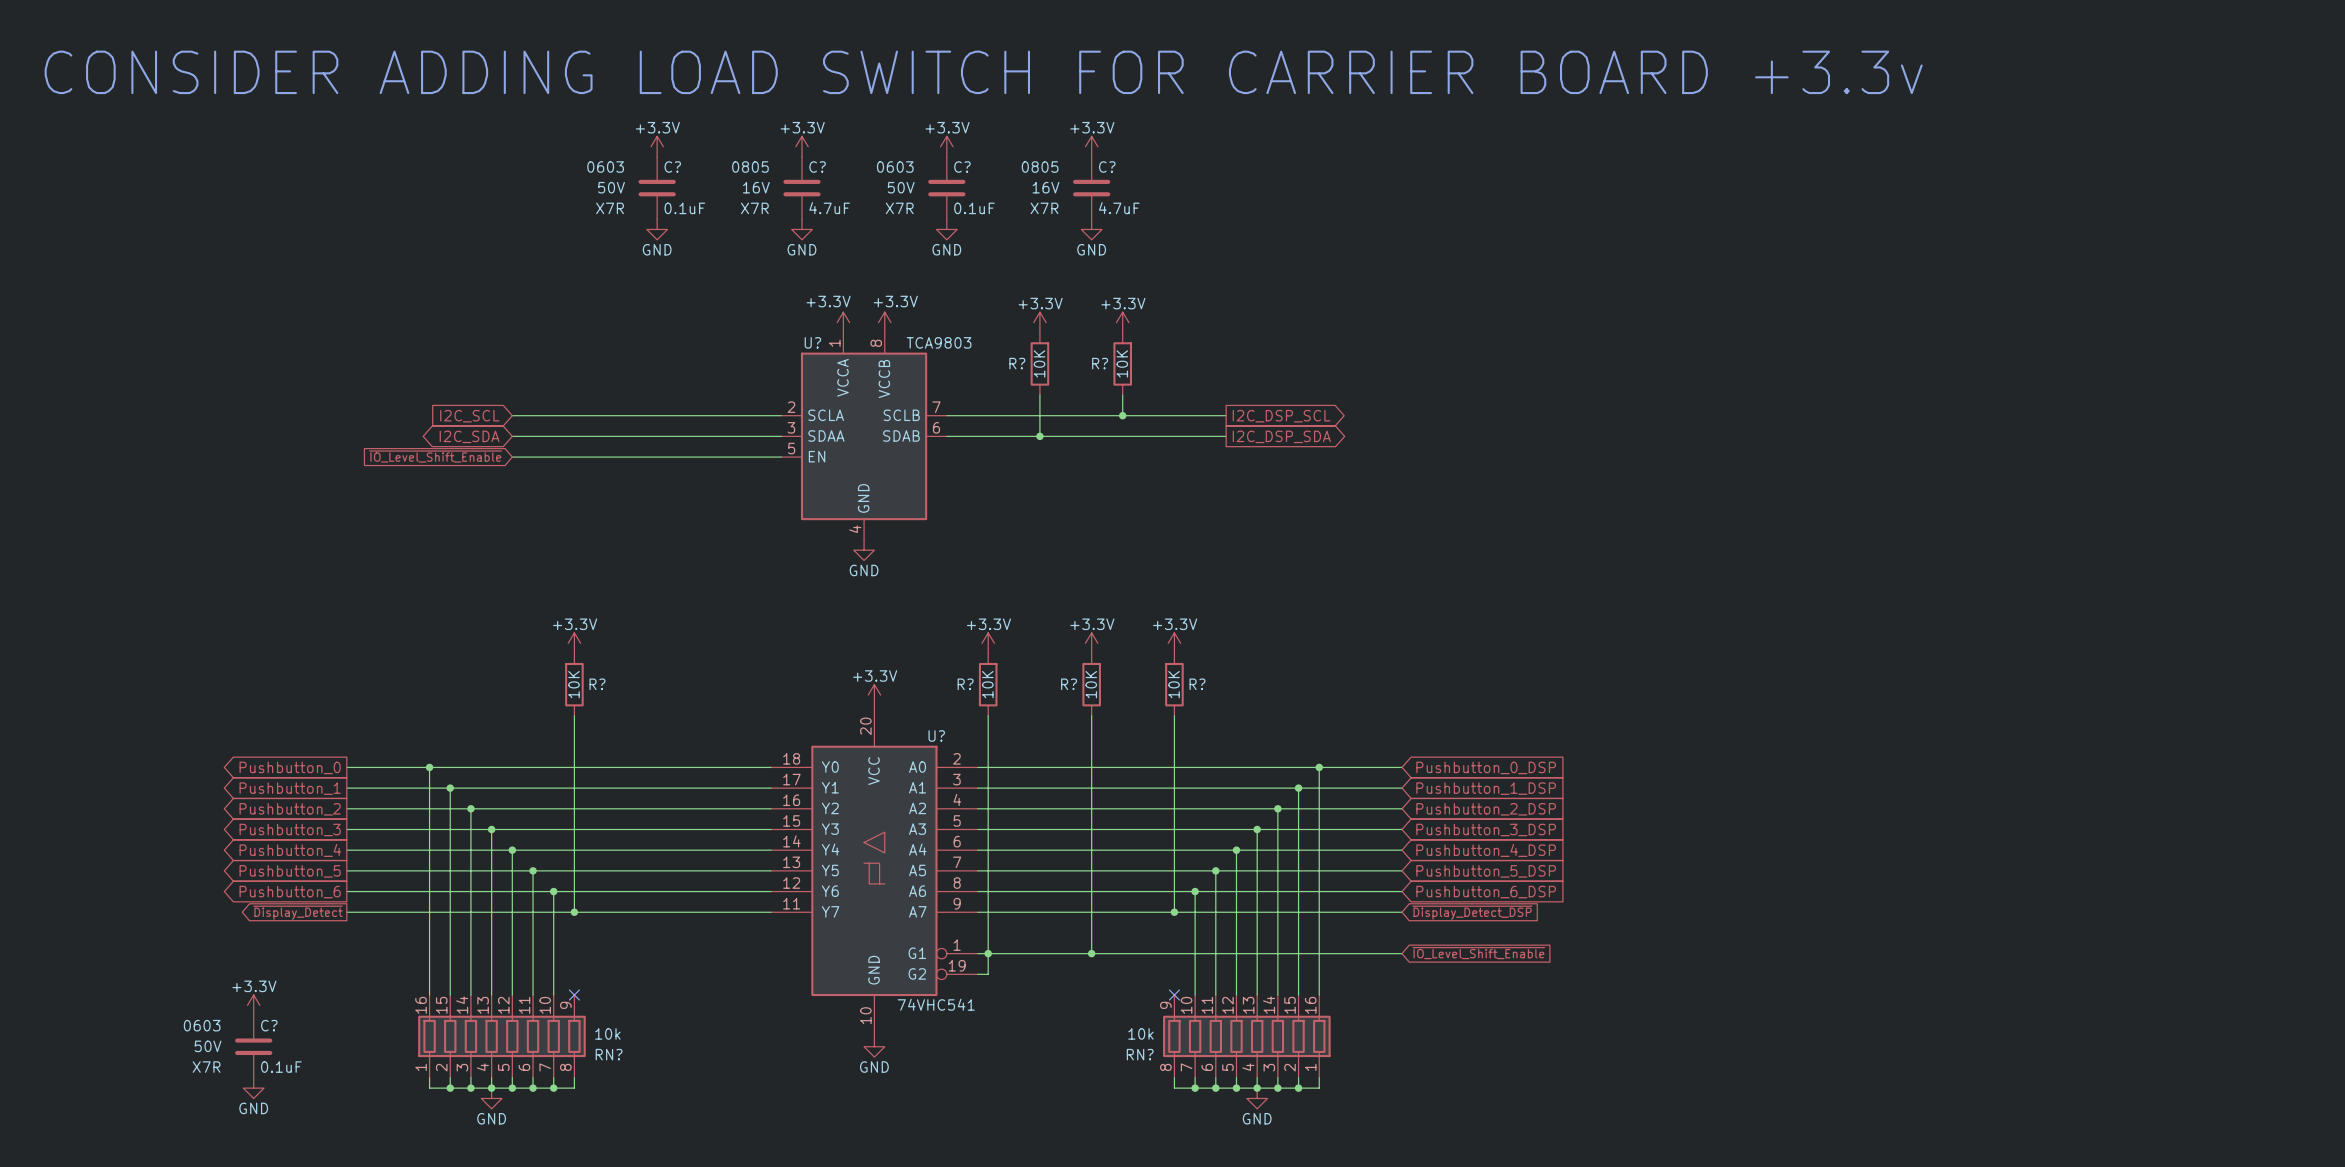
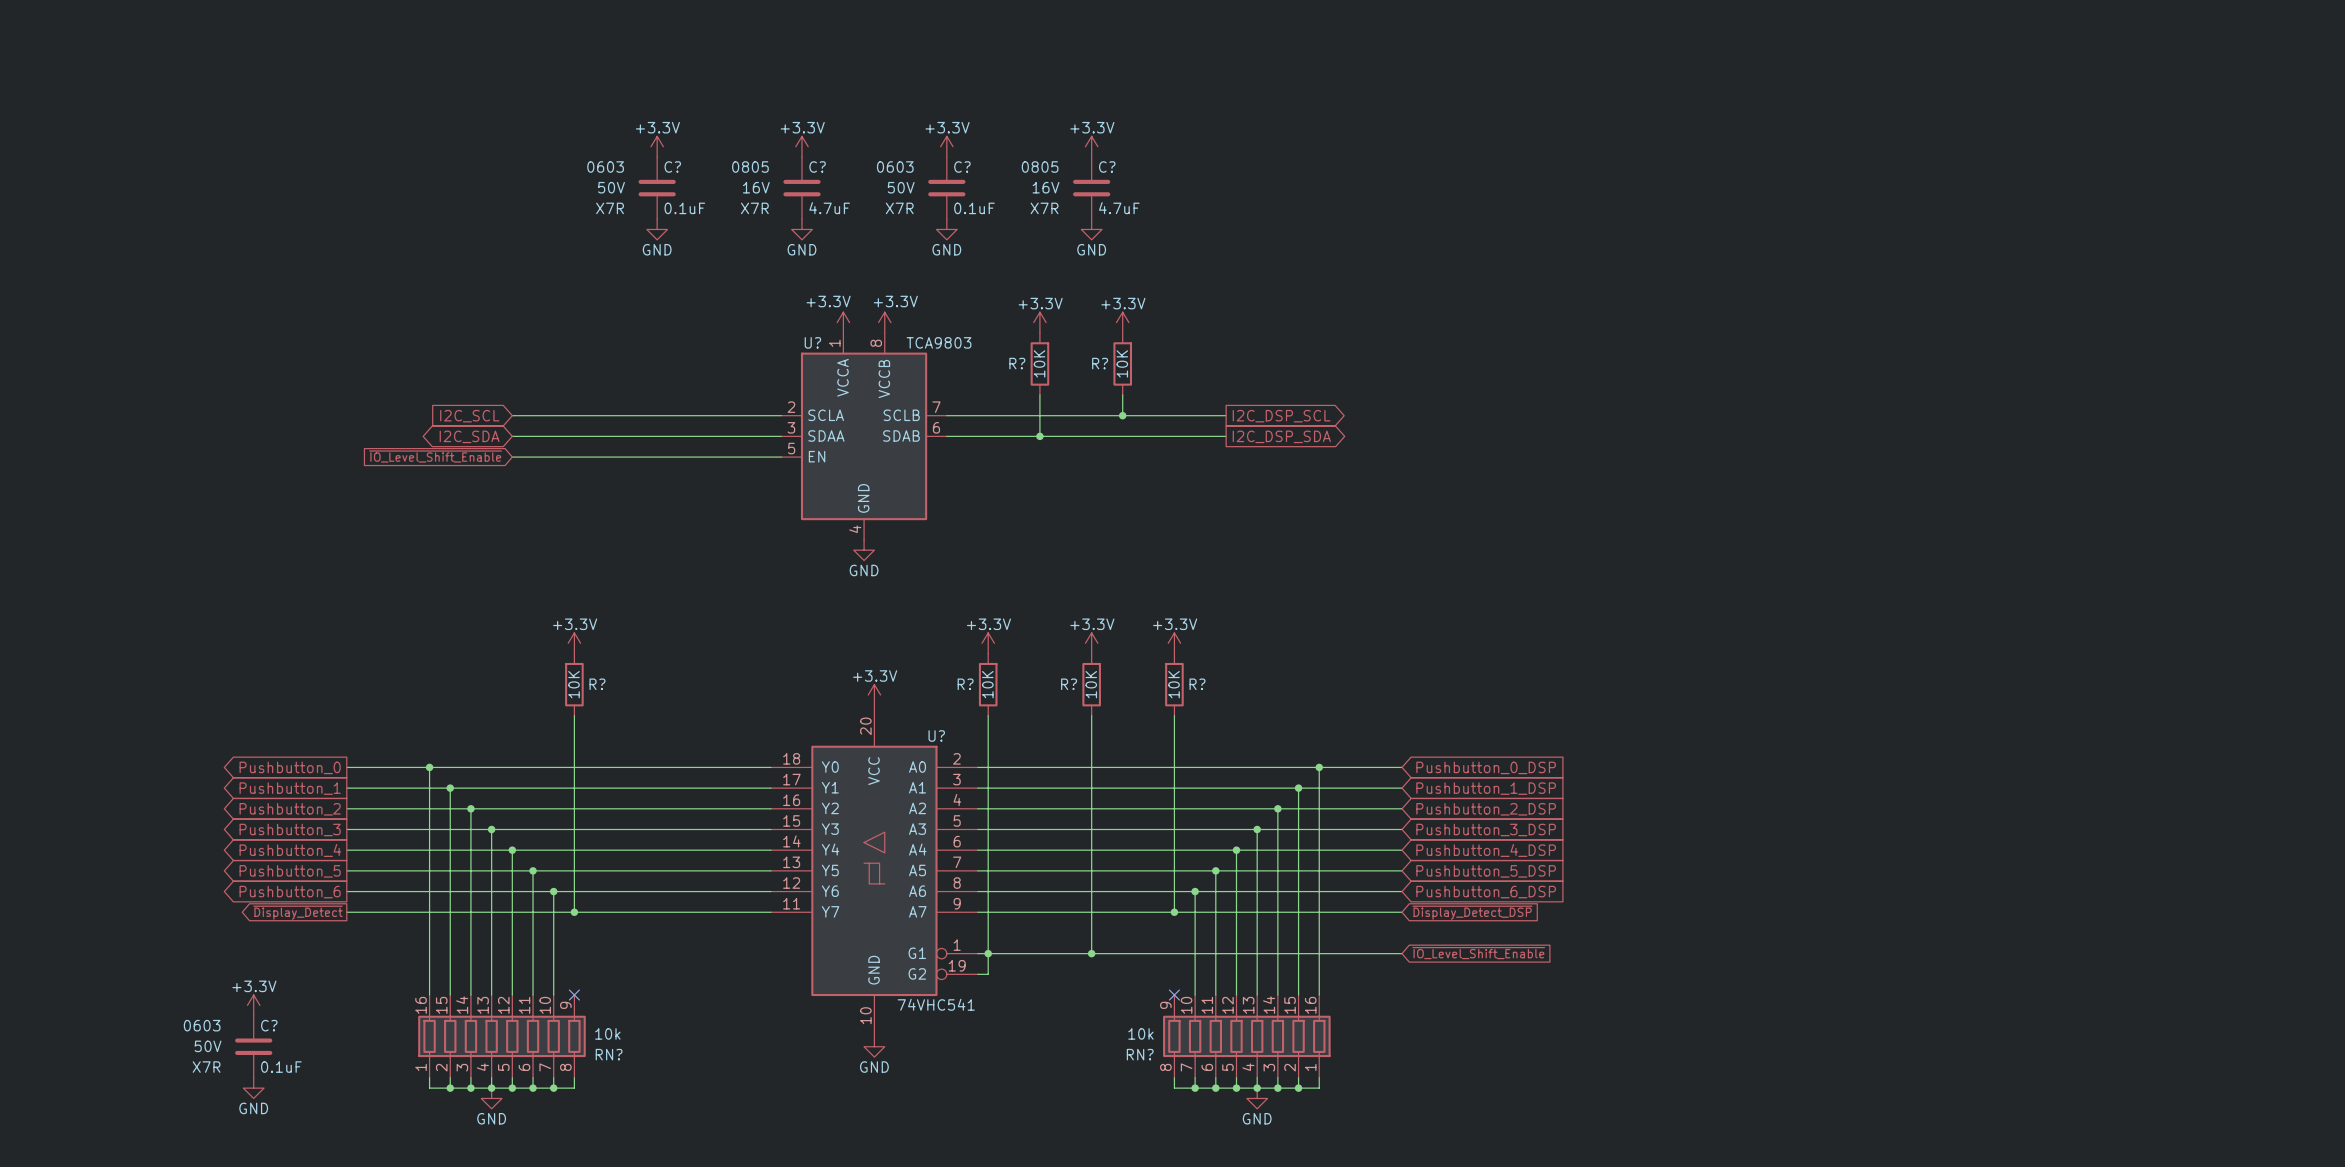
text: CONSIDER ADDING LOAD SWITCH FOR CARRIER BOARD +3.3v (983, 72) -> none

